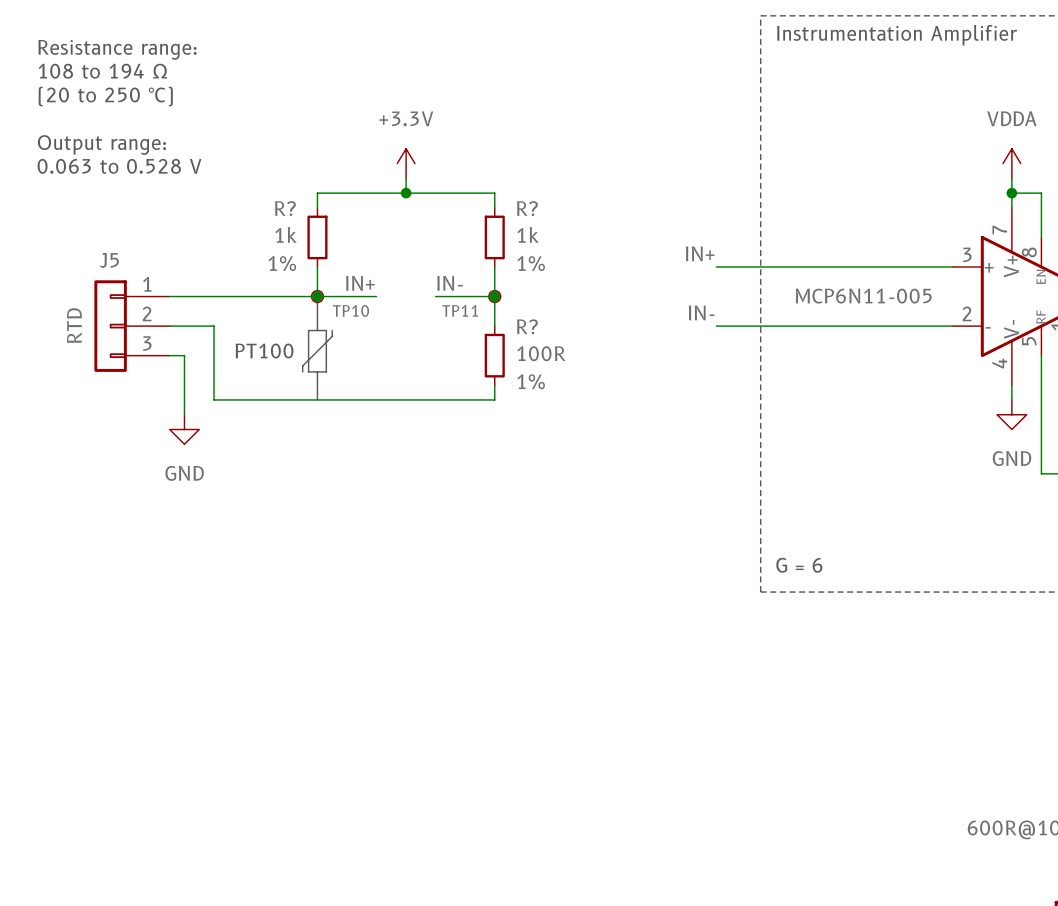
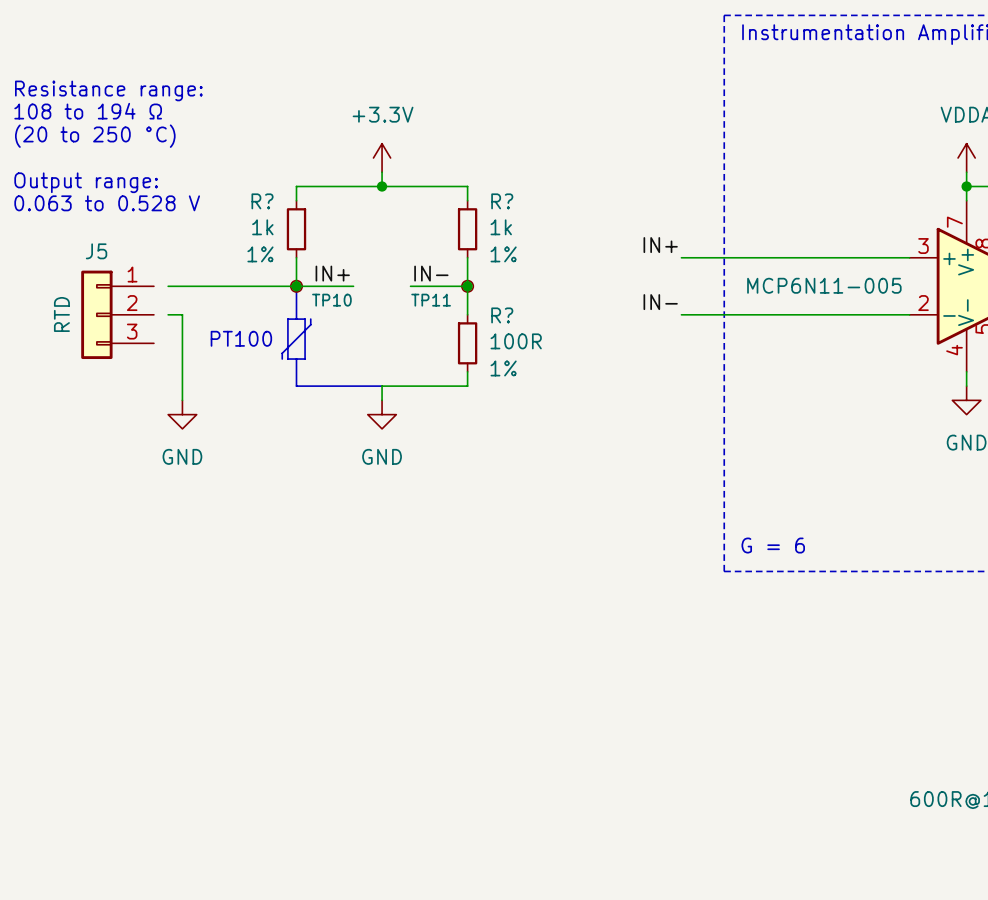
text position: Resistance range: (117, 49) -> Resistance range: (108, 90)
text position: 108 to 194 Ω (102, 71) -> 108 to 194 Ω (88, 111)
text position: (20 to 250 °C) (105, 96) -> (20 to 250 °C) (95, 136)
text position: Output range: (101, 144) -> Output range: (86, 182)
text position: 0.063 to 0.528 V (119, 166) -> 0.063 to 0.528 V (107, 203)
wire: (169, 296) (184, 296) -> none
wire: (169, 326) (184, 326) -> none
wire: (199, 326) (214, 326) (214, 399) (406, 399) -> (182, 314) (182, 400)
wire: (169, 355) (184, 355) (184, 414) -> none
line: none -> (296, 386) (382, 386)
wire: none -> (382, 386) (382, 400)
power symbol position: GND (184, 429) -> GND (182, 414)
power symbol: none -> GND (382, 414)

